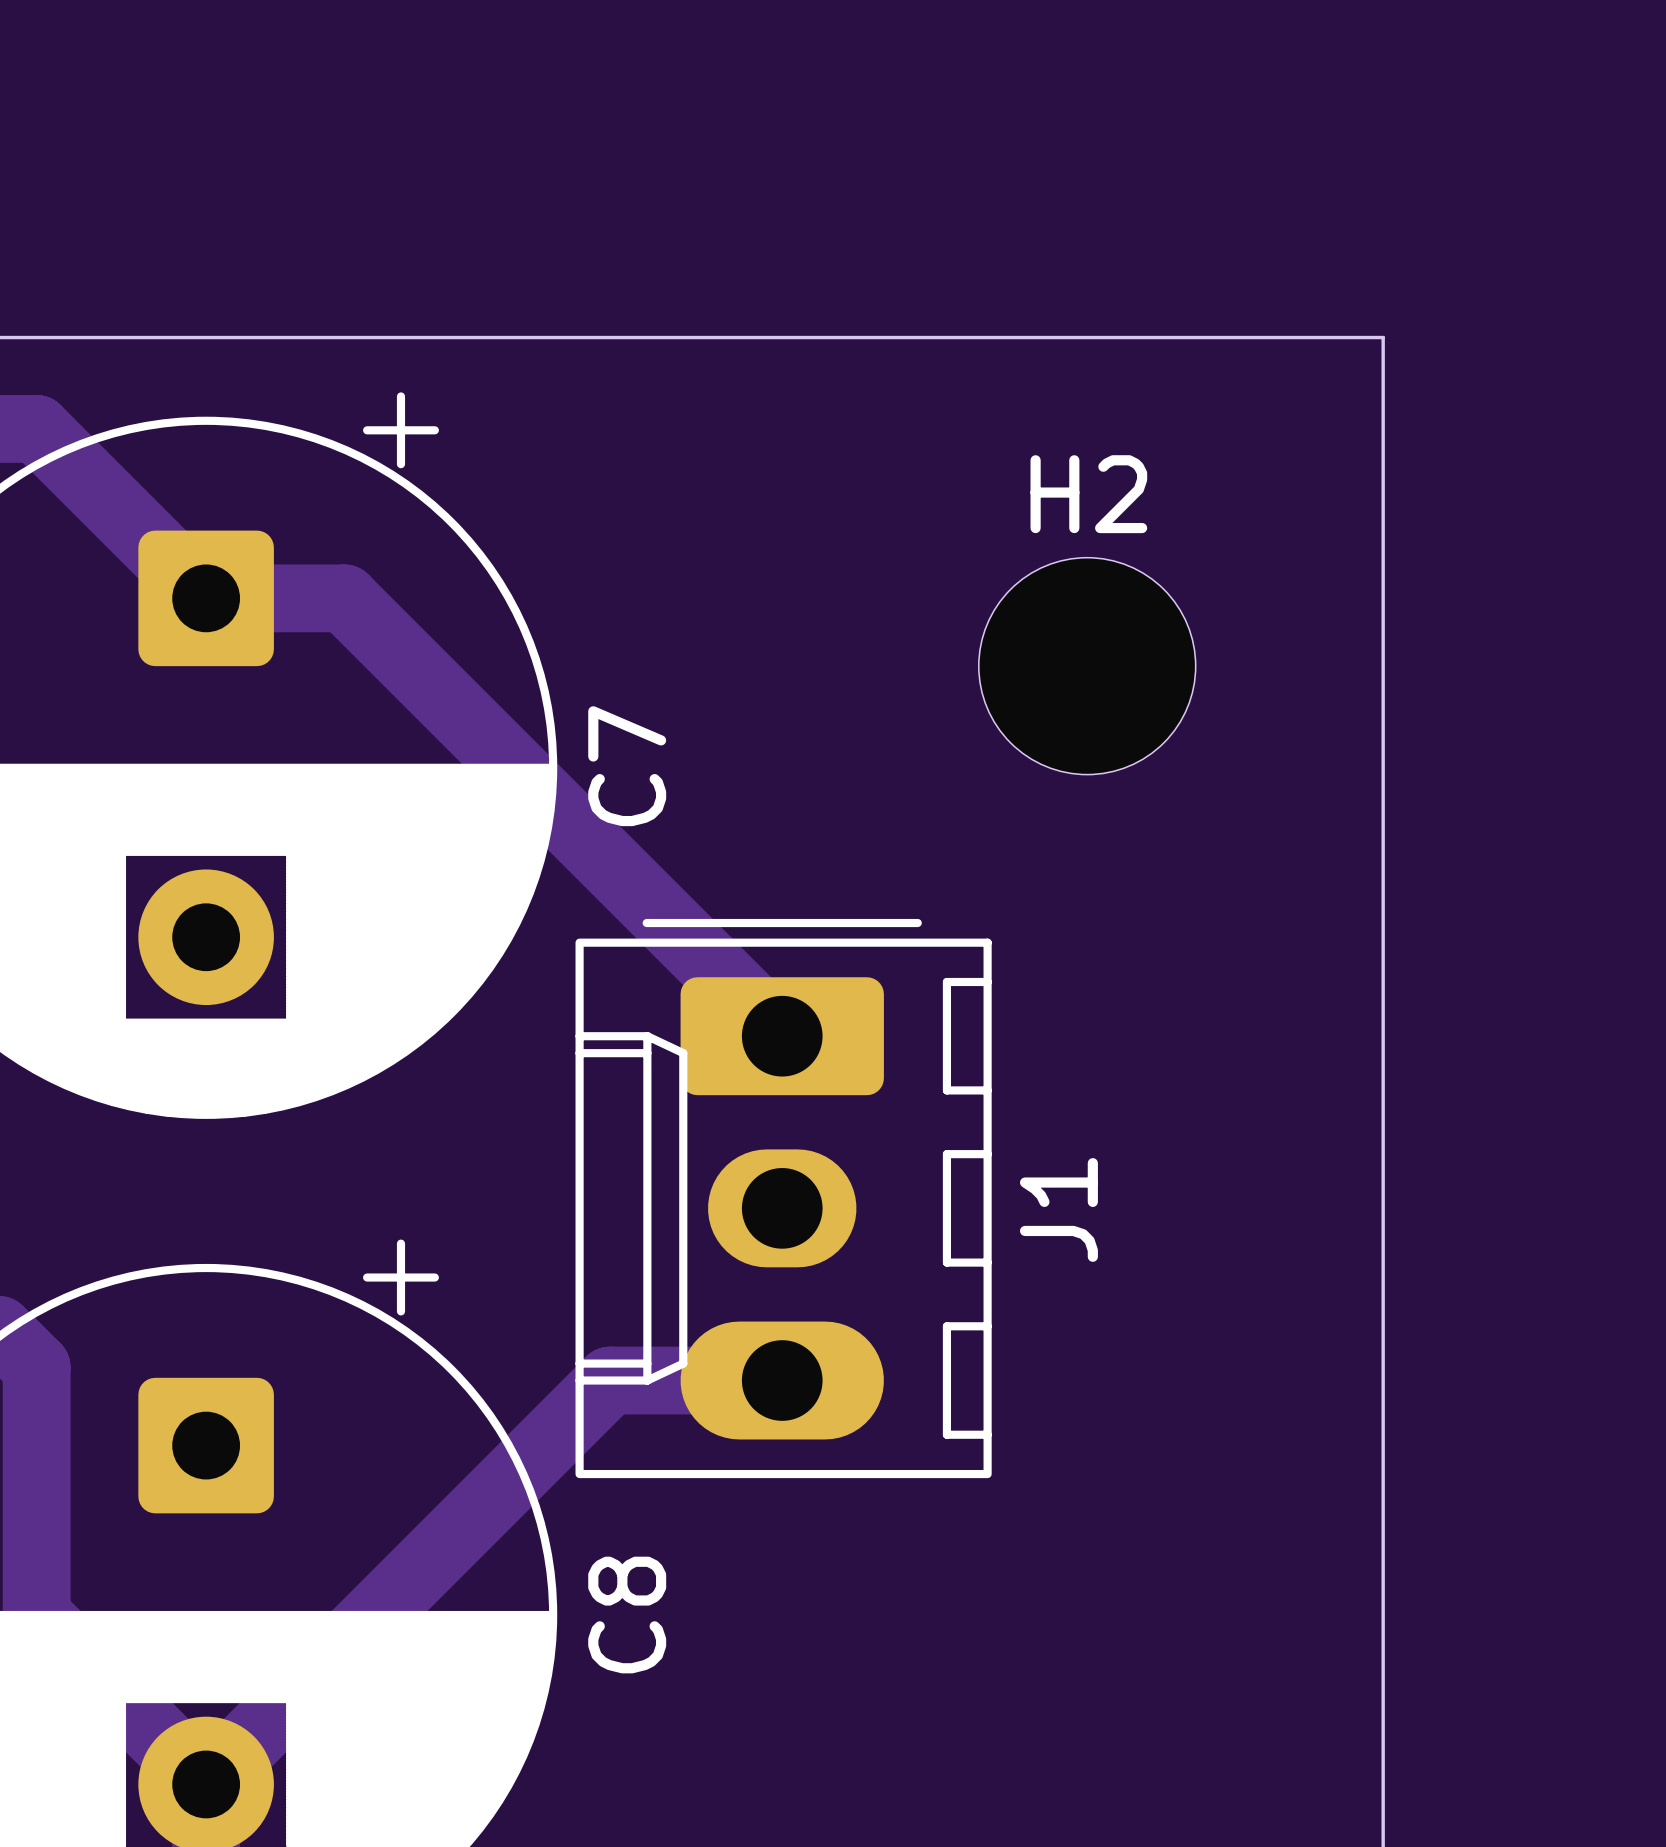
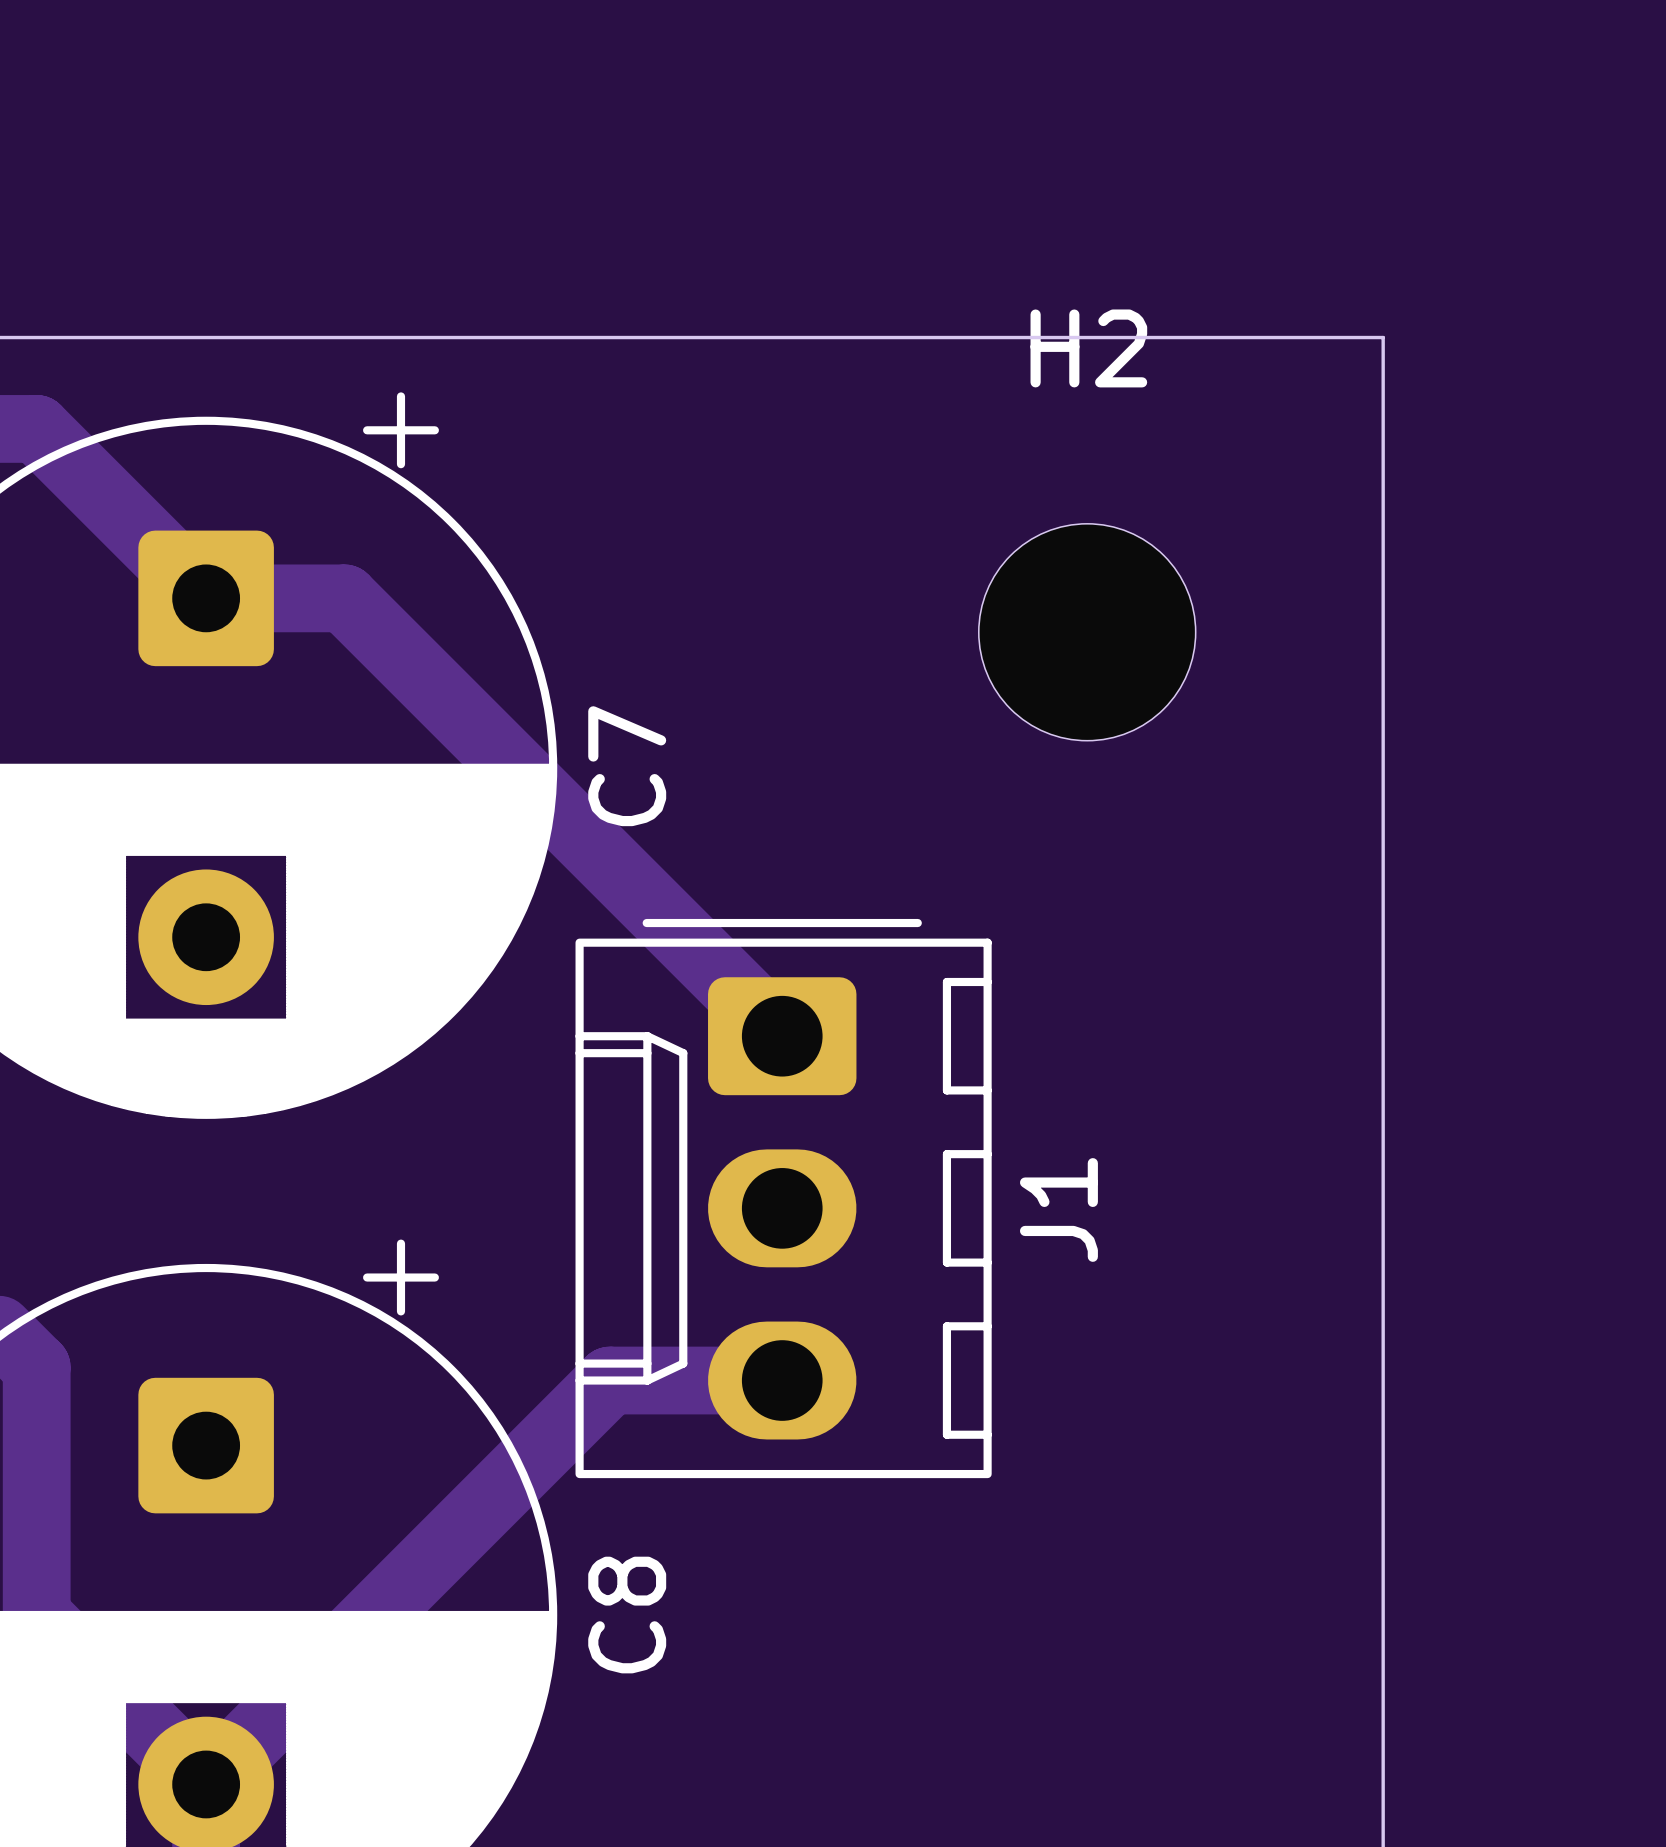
H2 name position: H2 (1088, 494) -> H2 (1088, 348)
H2 position: (1087, 666) -> (1087, 632)
J1 footprint: [575, 918, 992, 1479] -> [575, 918, 992, 1479]

